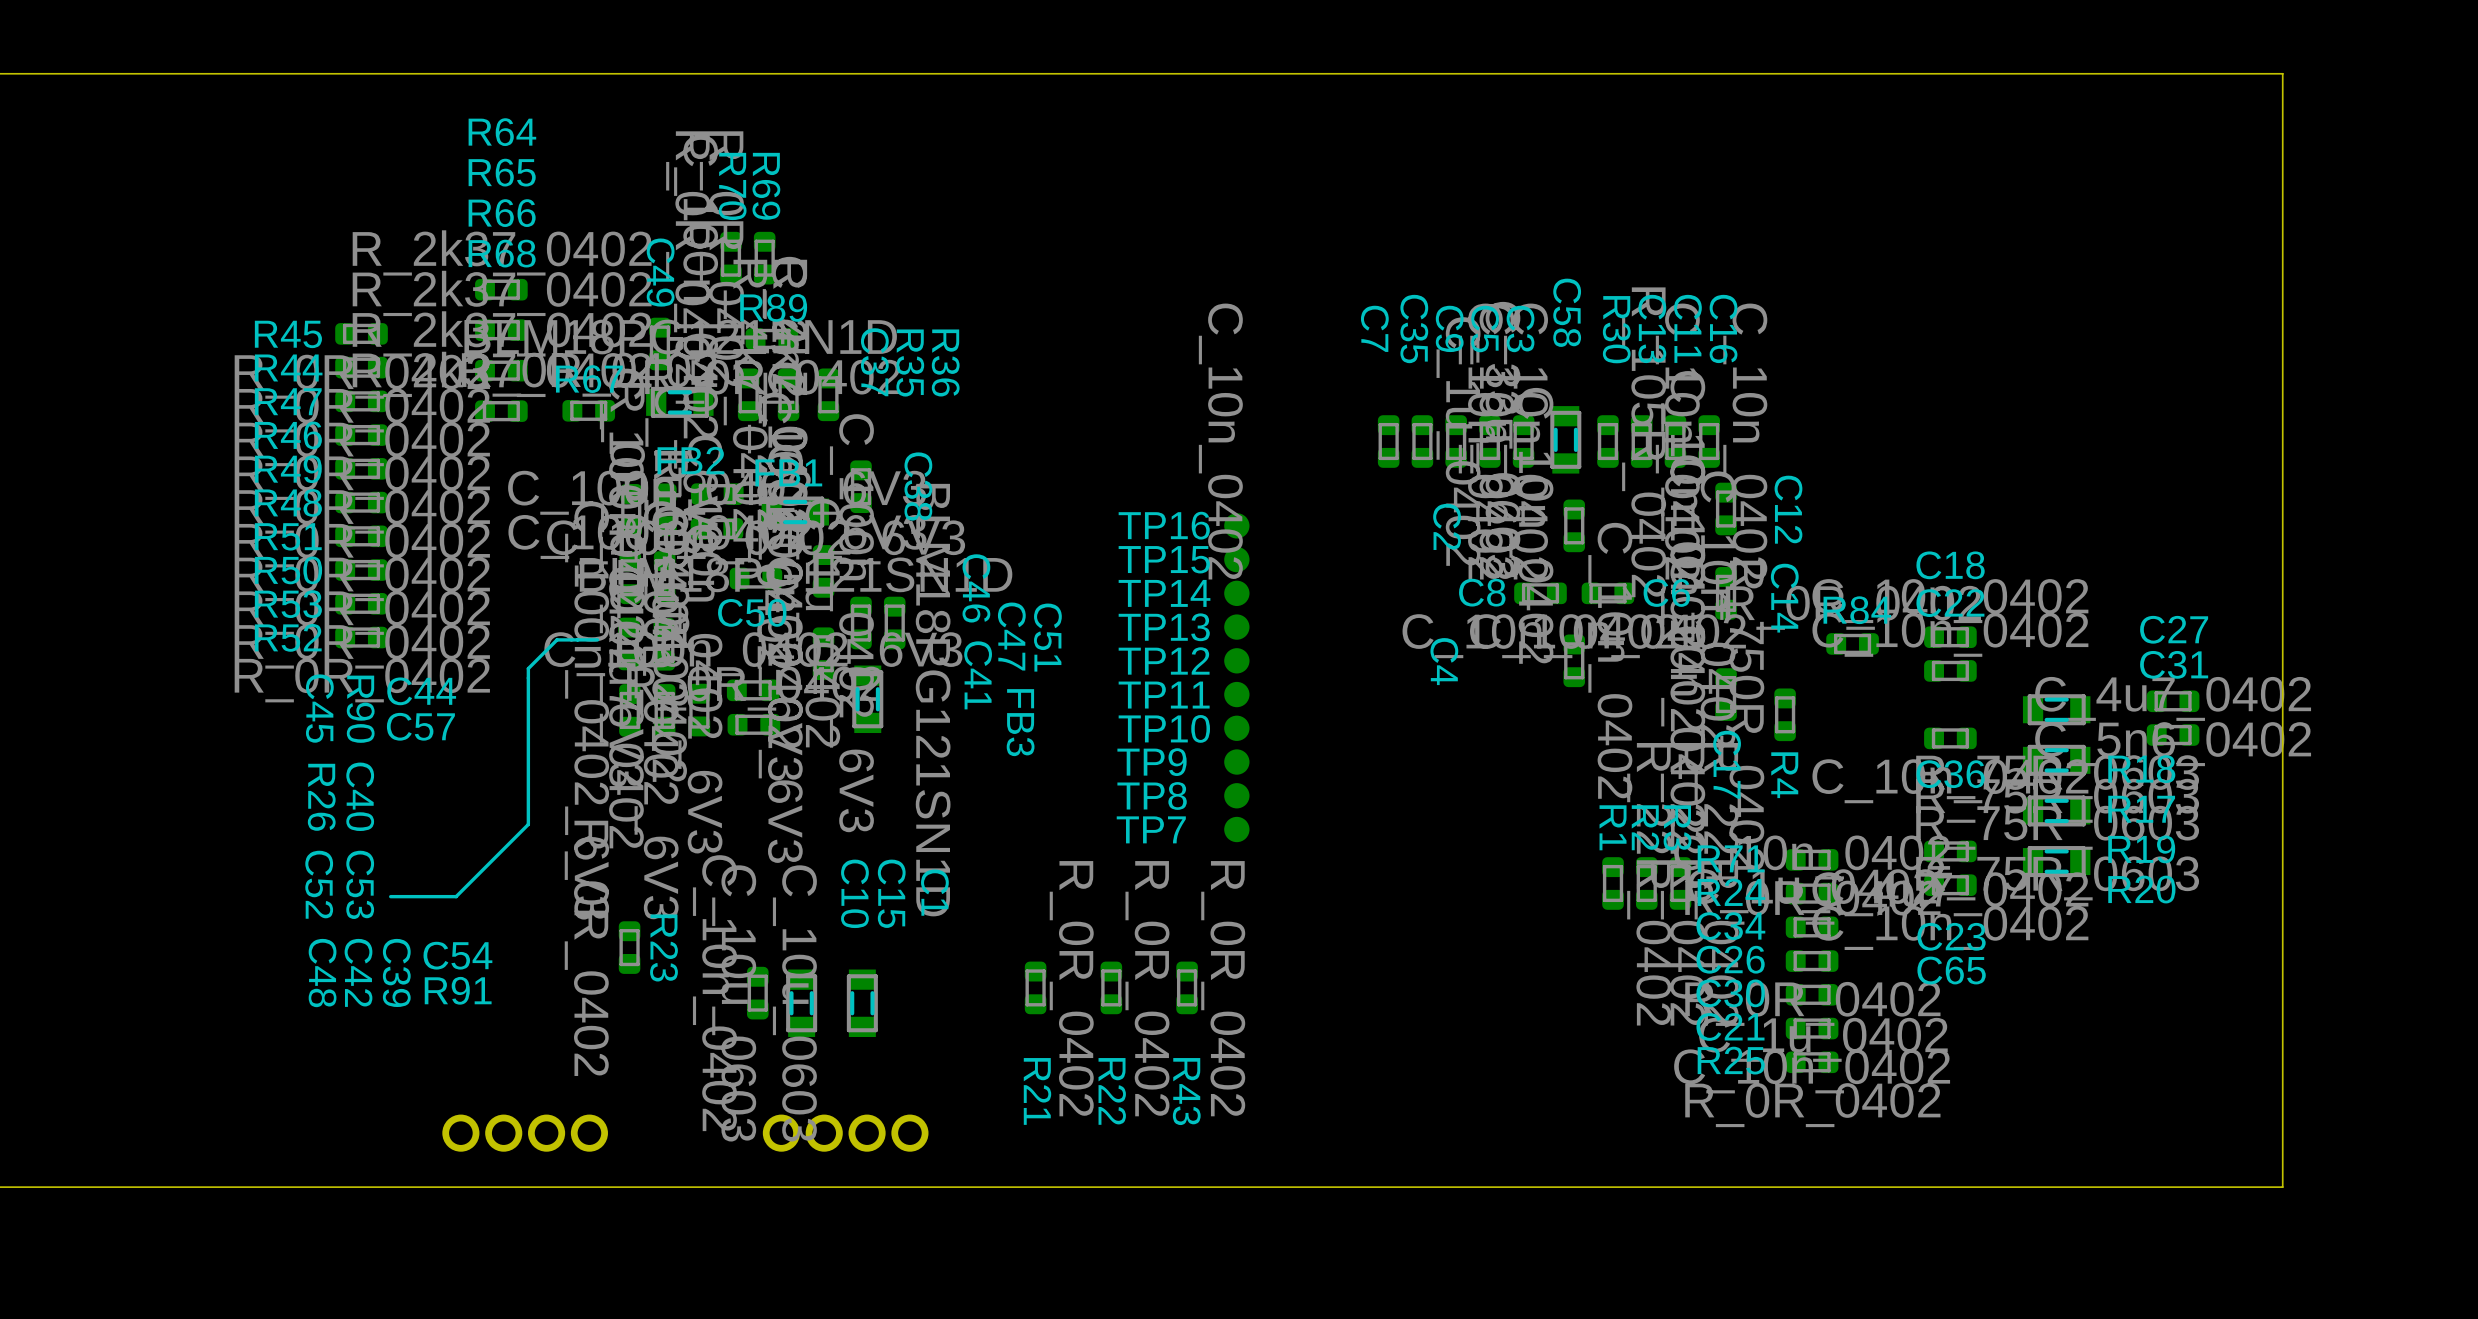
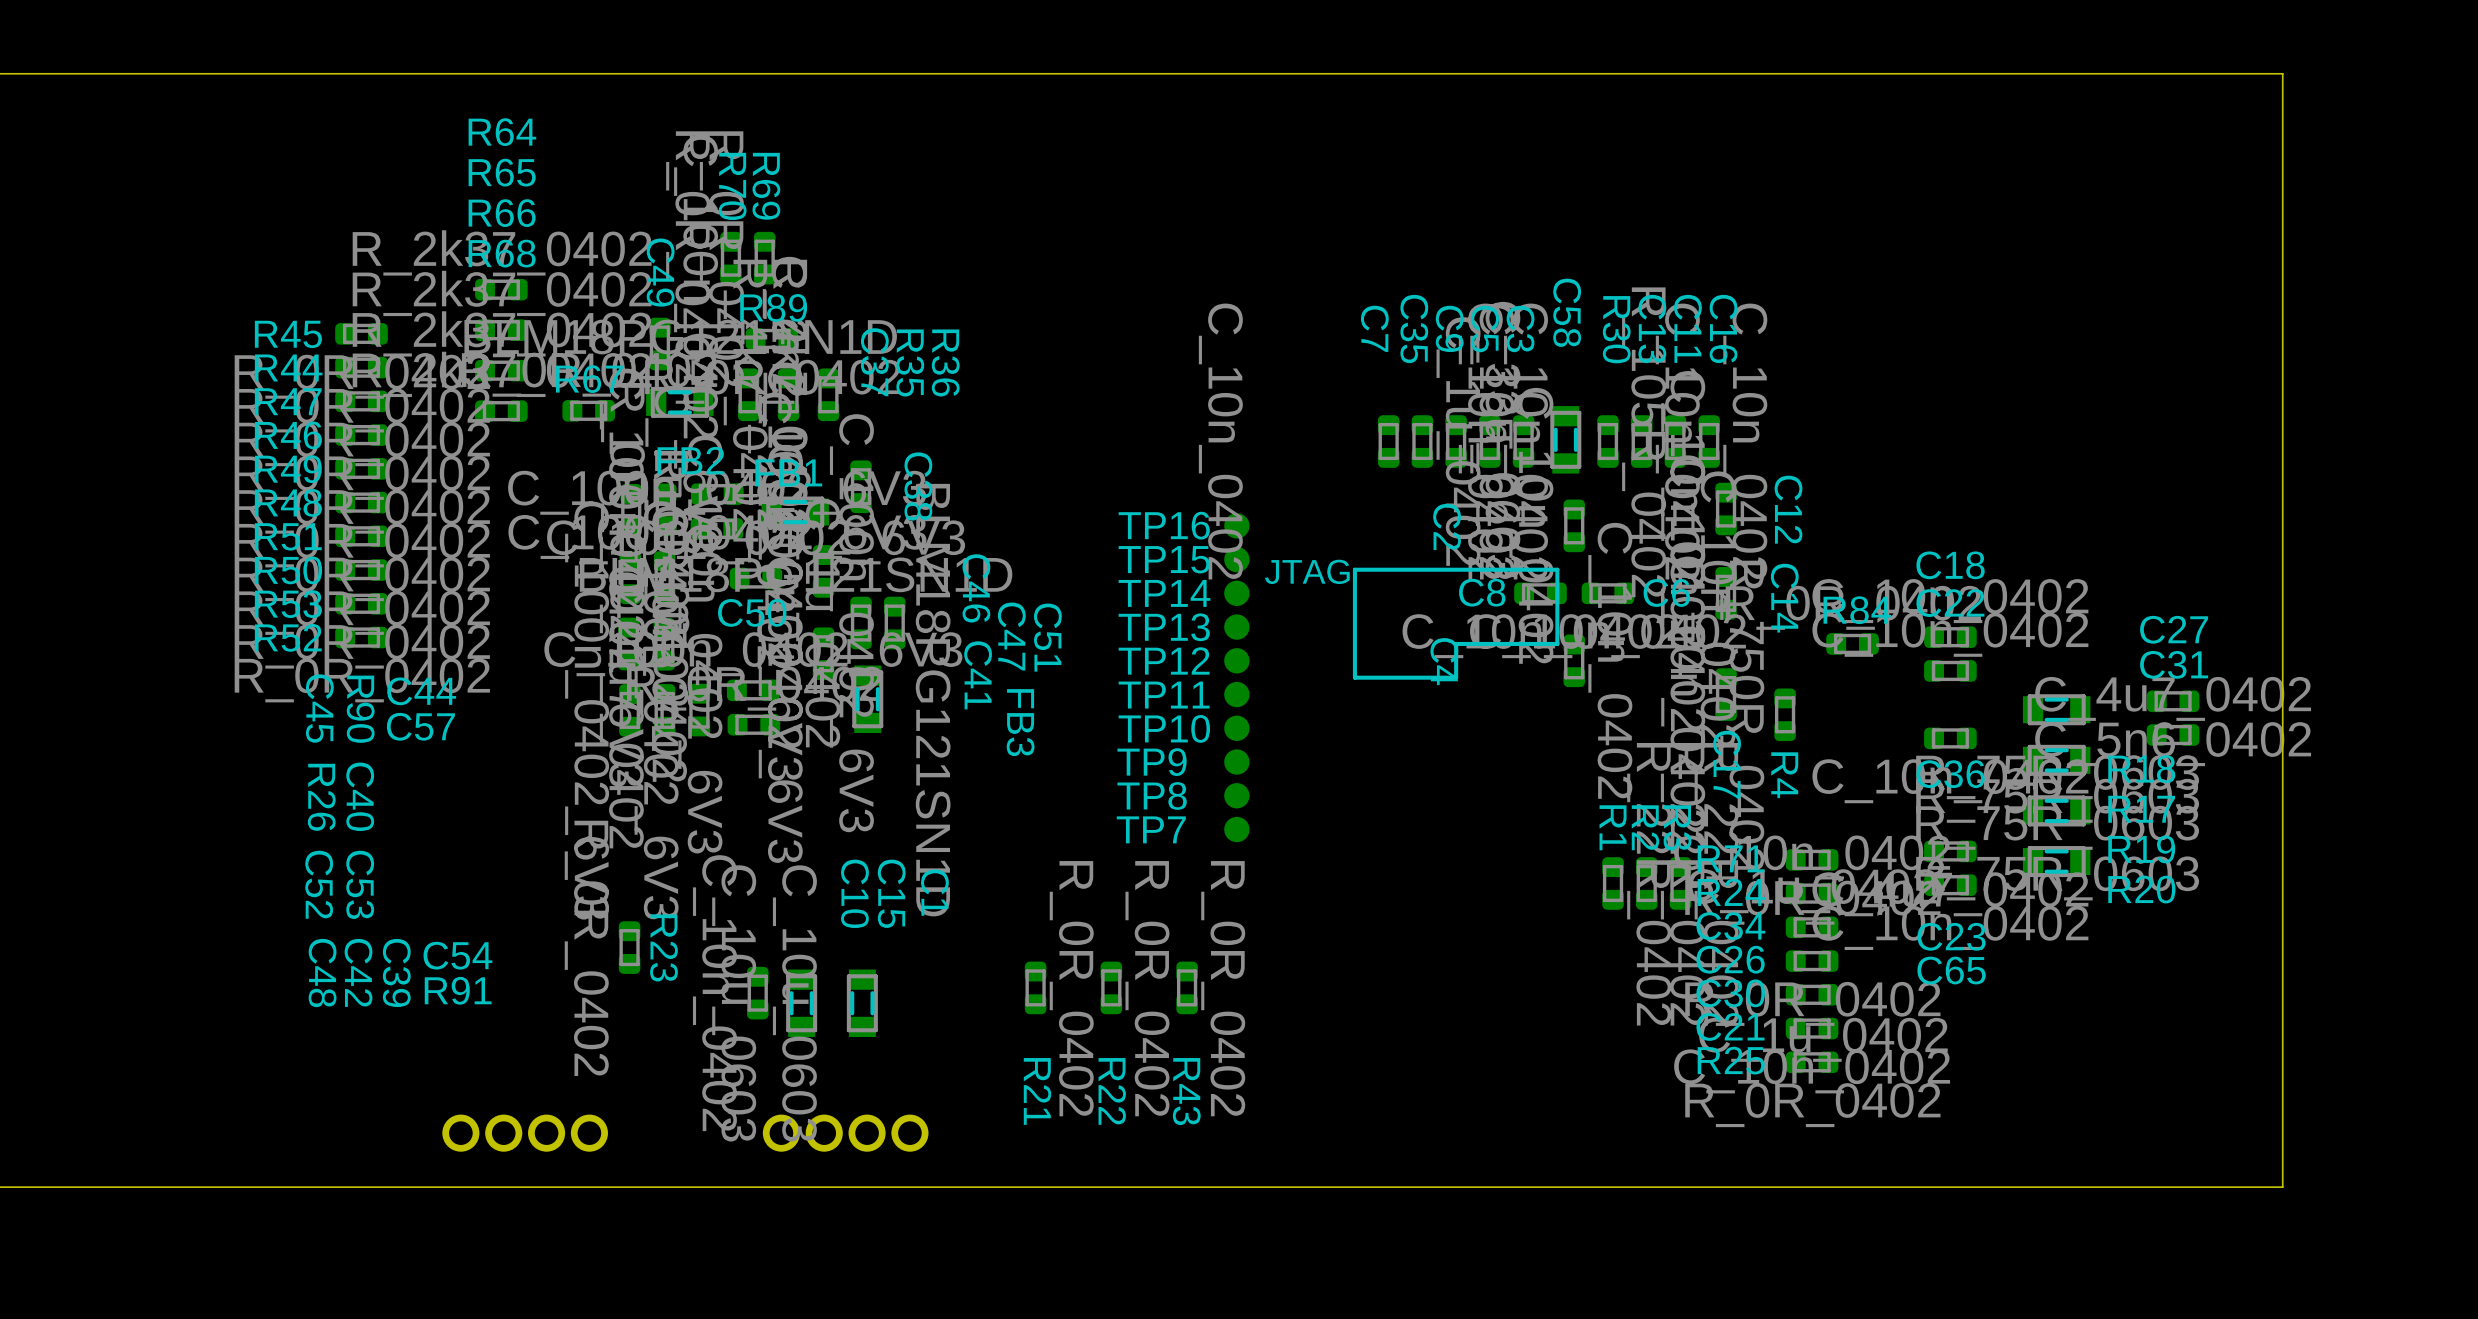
line: none -> (1557, 569) (1557, 643) (1456, 643) (1456, 677) (1354, 677) (1354, 569) (1557, 569)
text: none -> JTAG (1307, 571)
line: (597, 639) (557, 639) (528, 668) (528, 824) (456, 896) (390, 896) -> none

